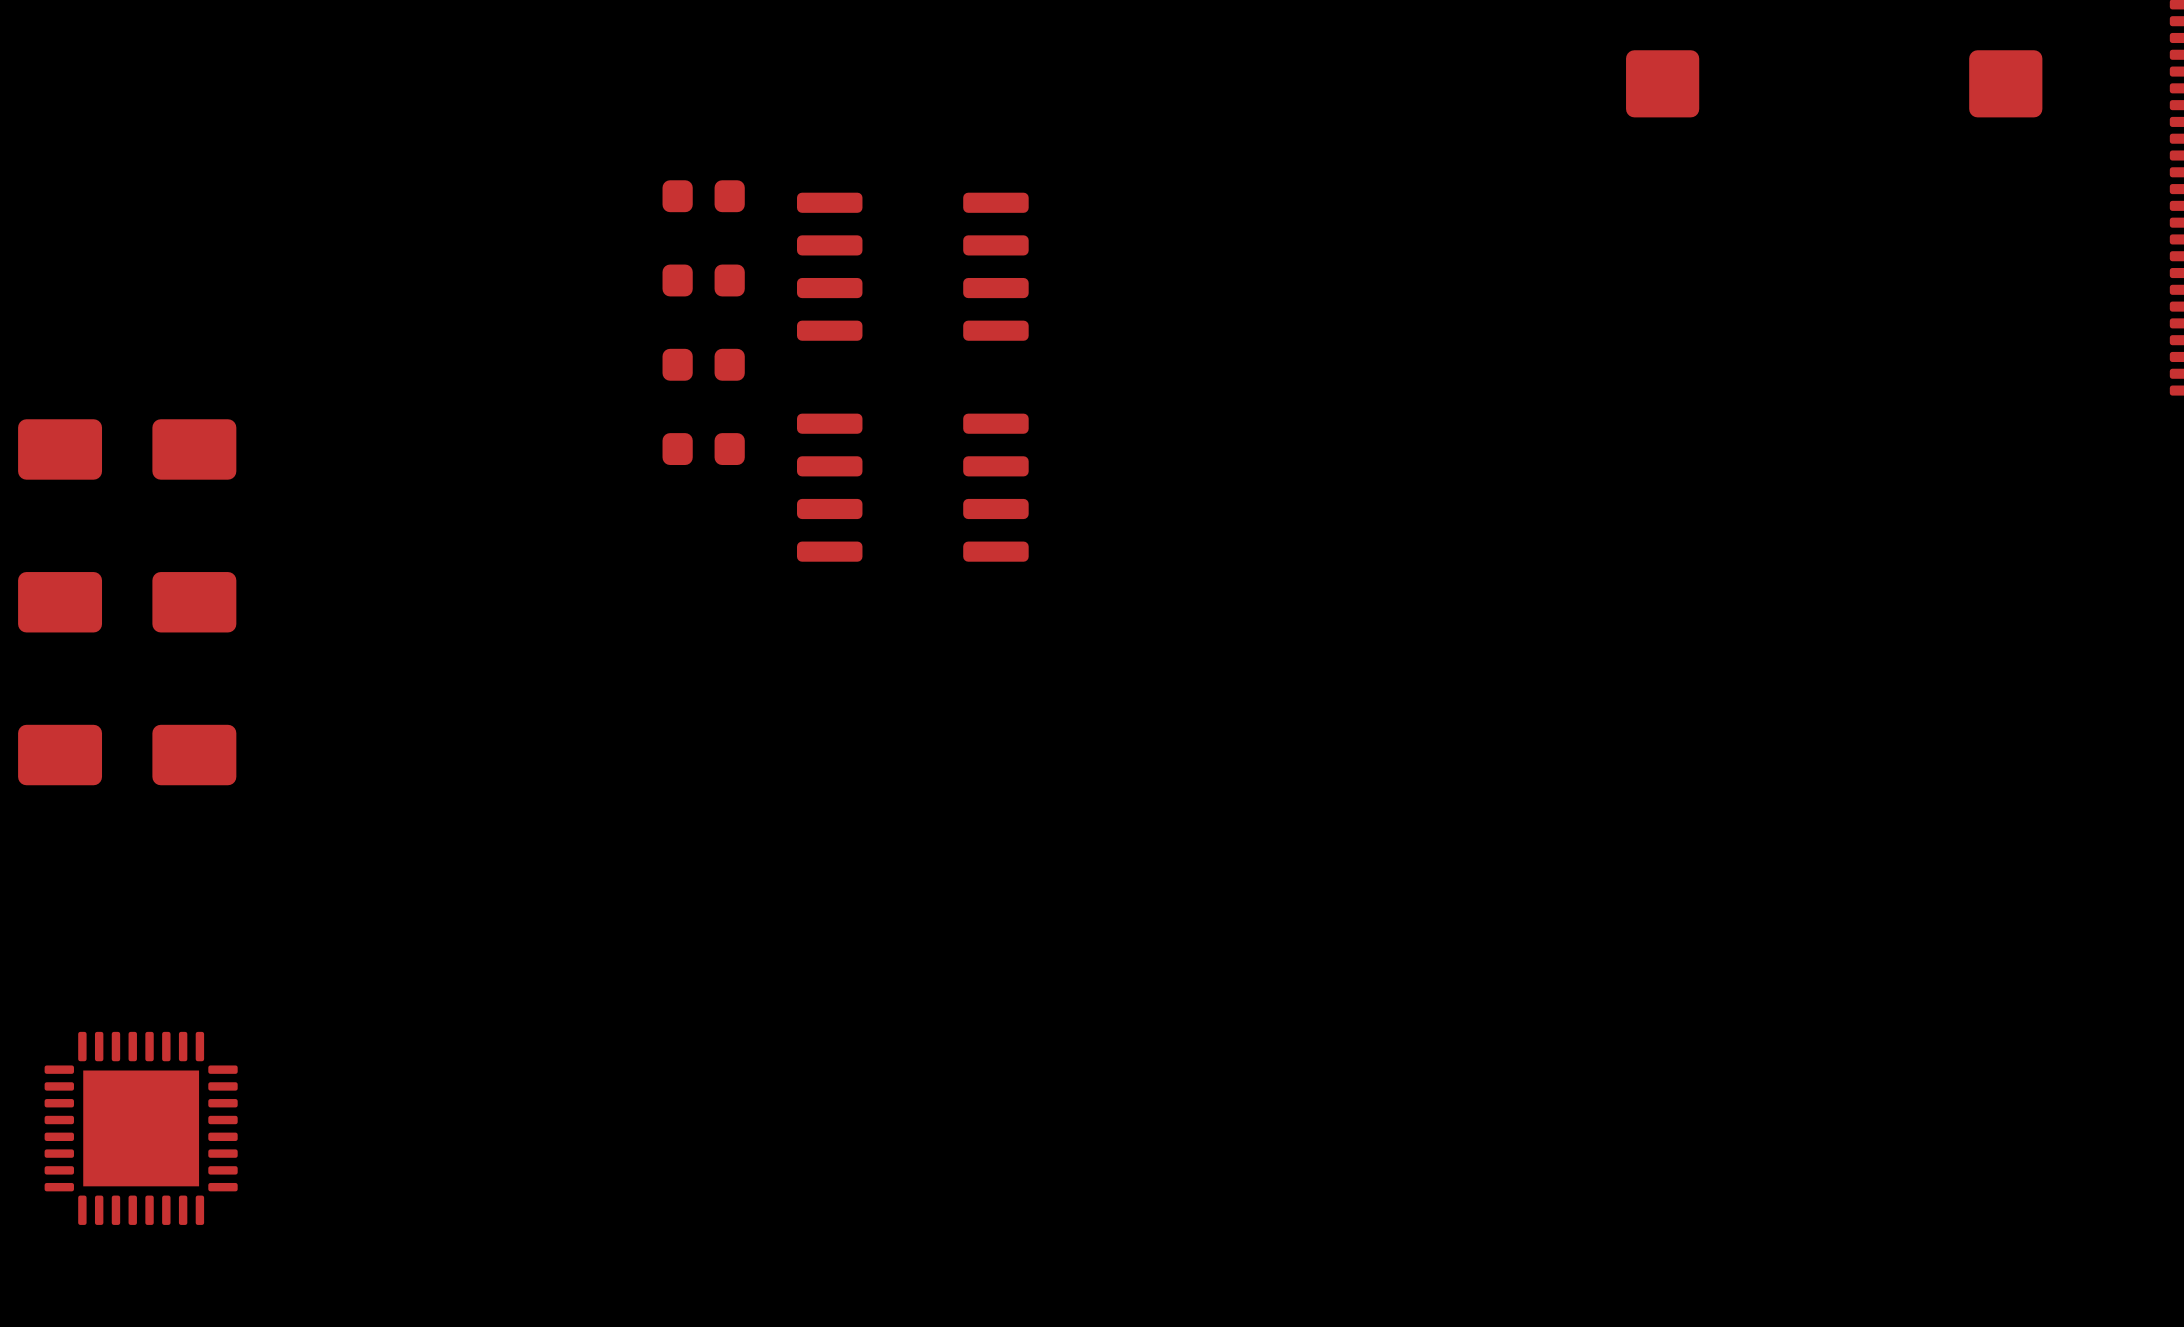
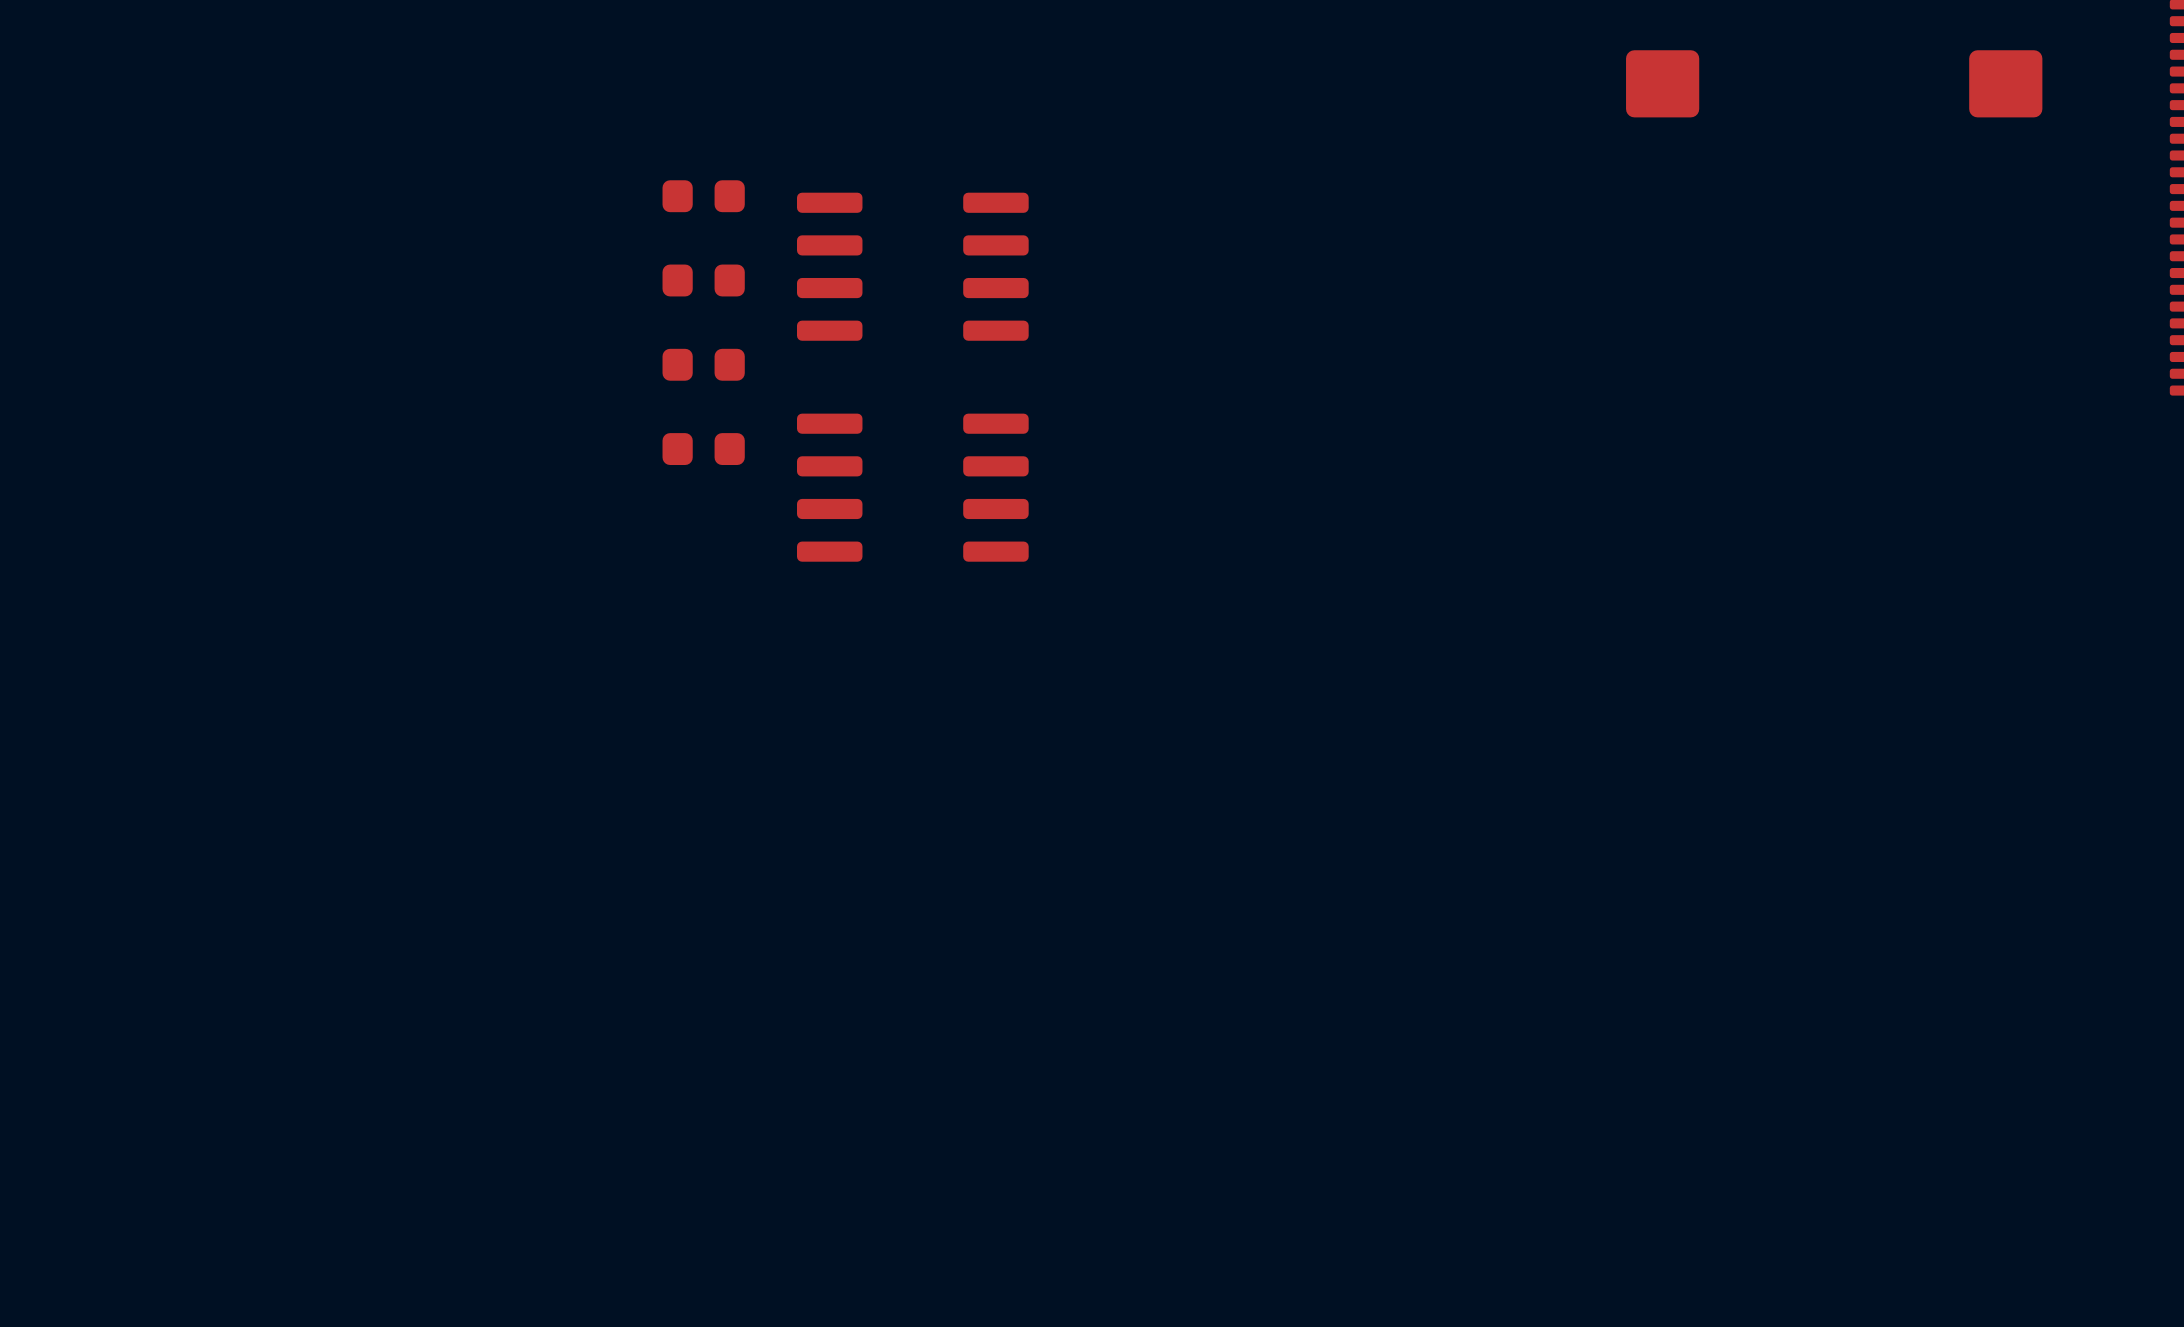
part: (127, 449) -> none
part: (127, 602) -> none
part: (127, 755) -> none
part: (141, 1128) -> none

